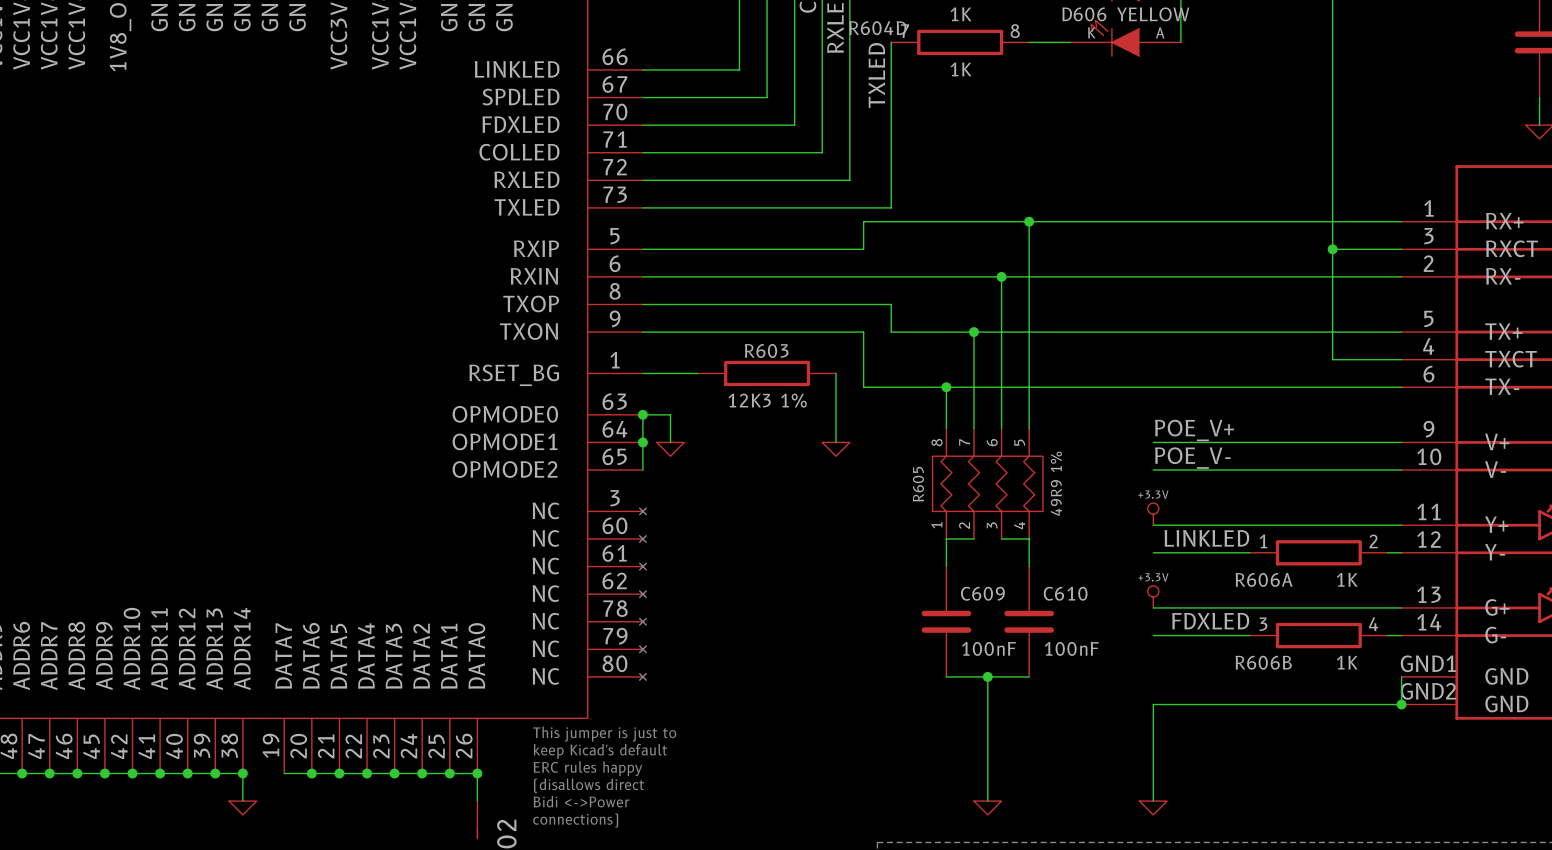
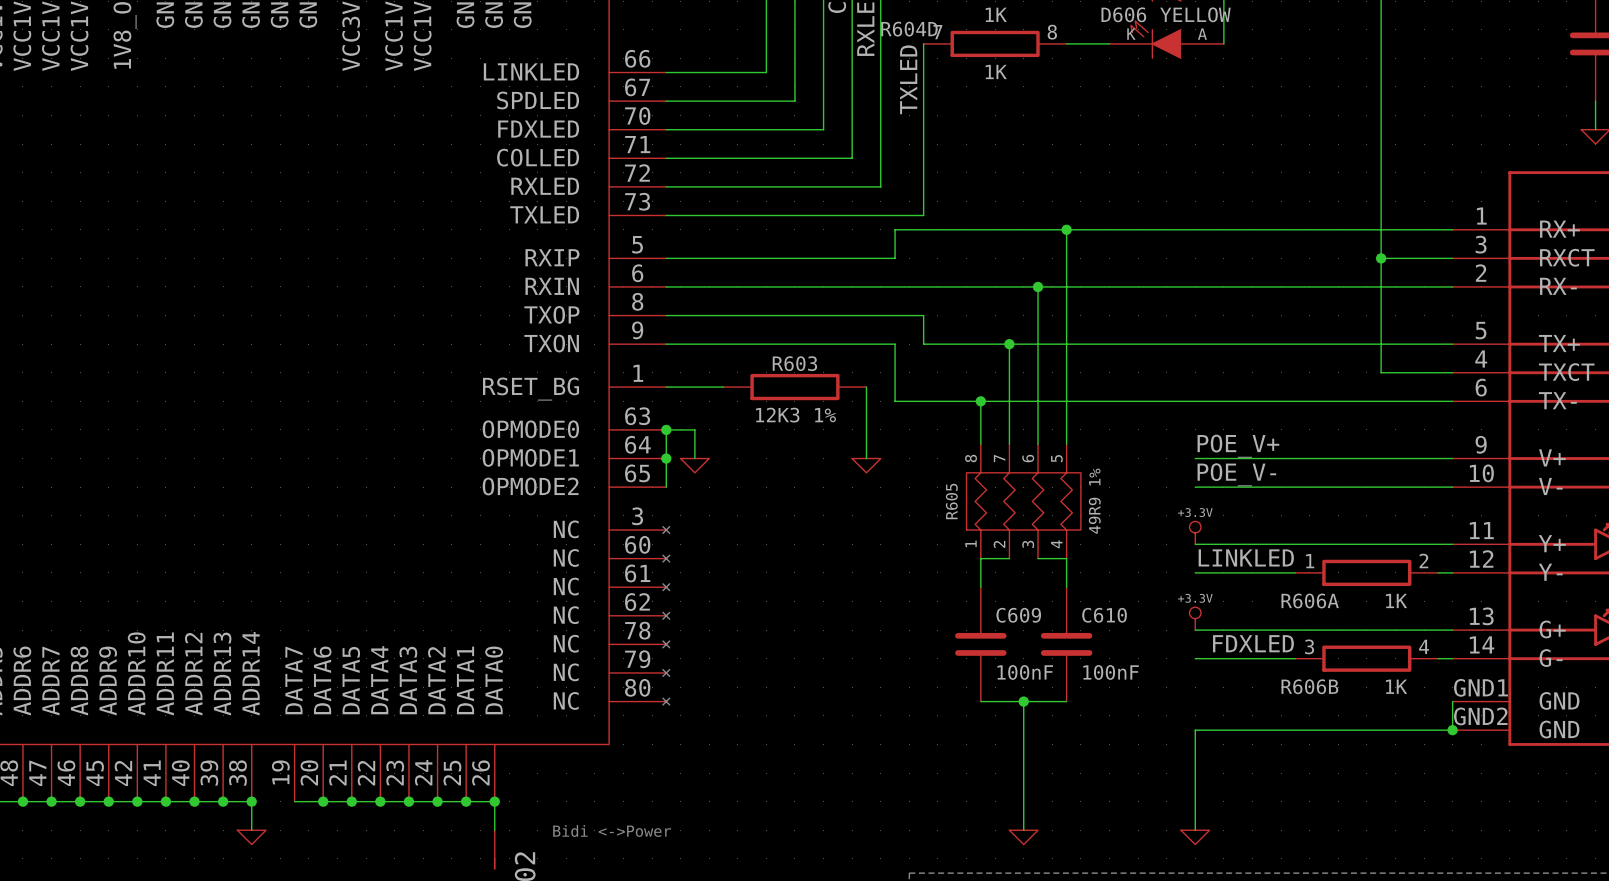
text: This jumper is just to (604, 734) -> none
text: keep Kicad's default (600, 751) -> none
text: ERC rules happy (587, 768) -> none
text: (disallows direct (589, 785) -> none
text: connections) (575, 820) -> none

